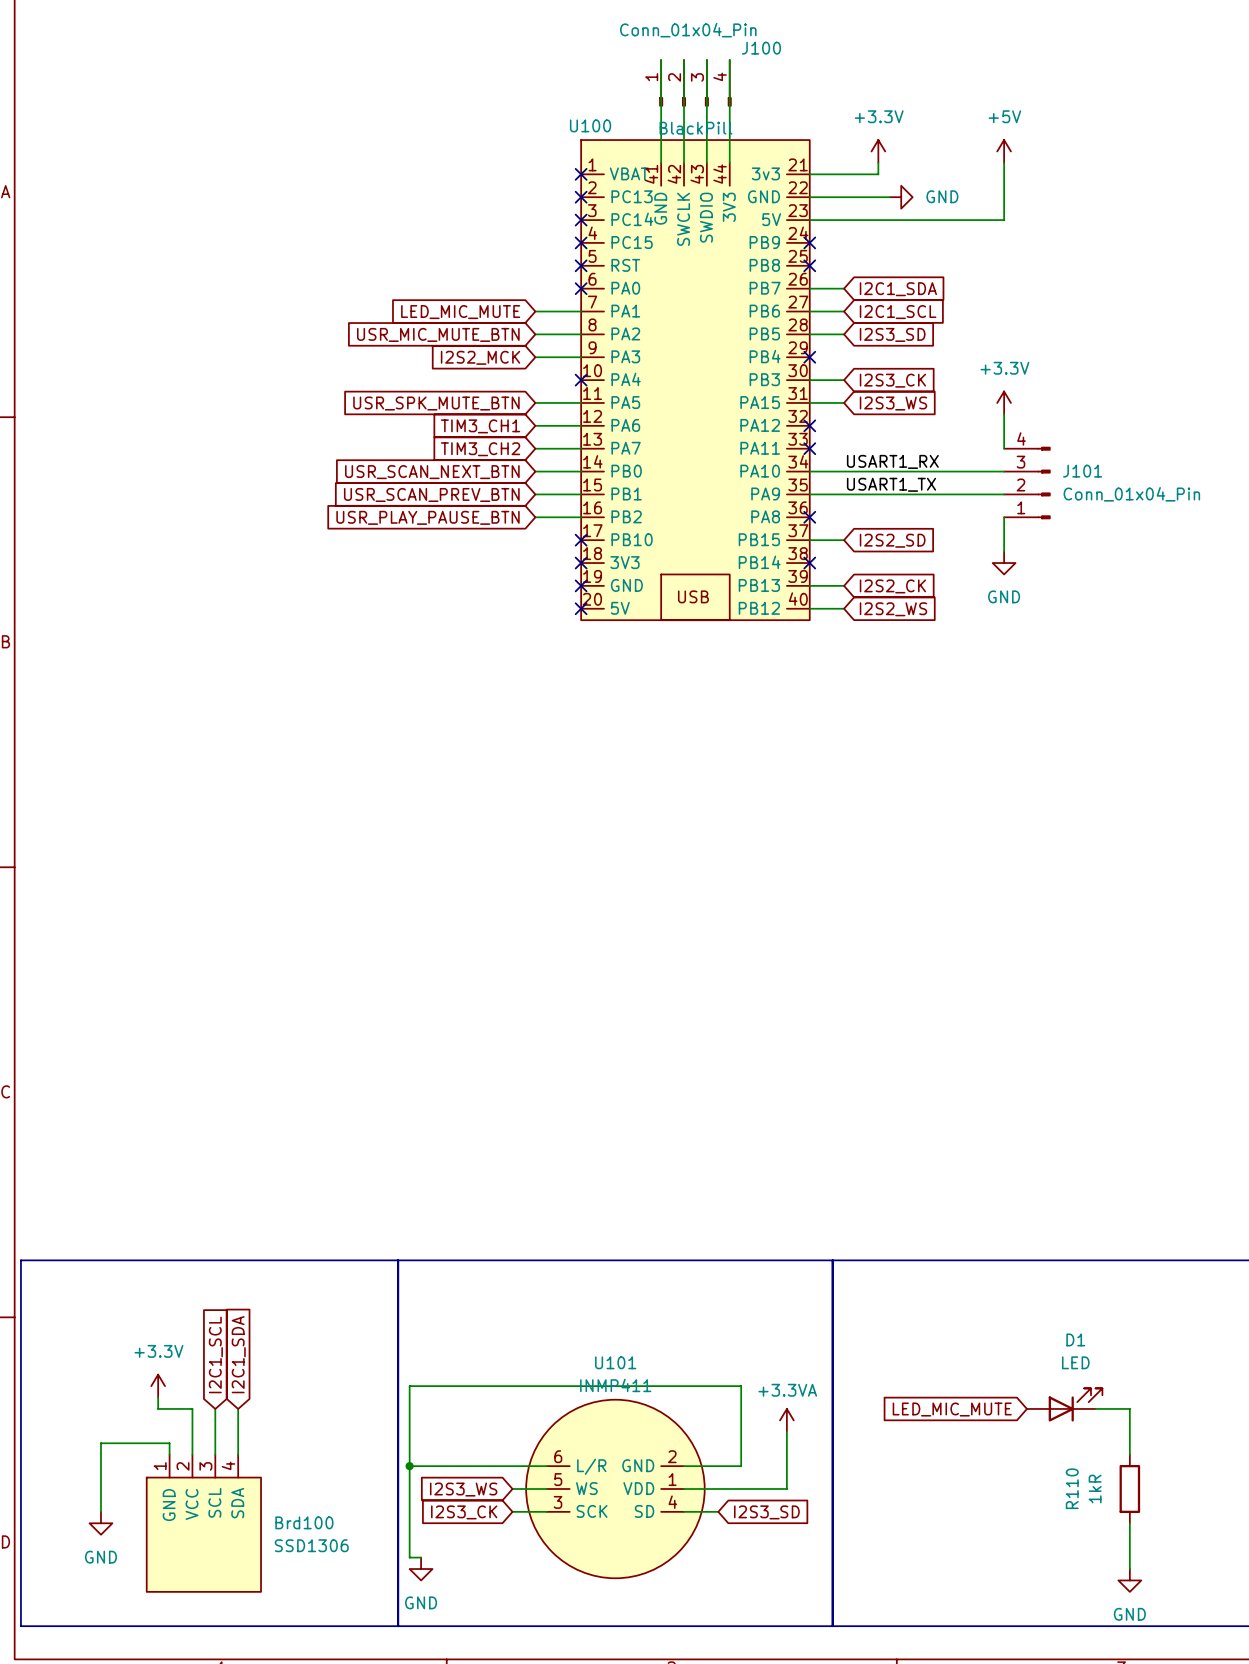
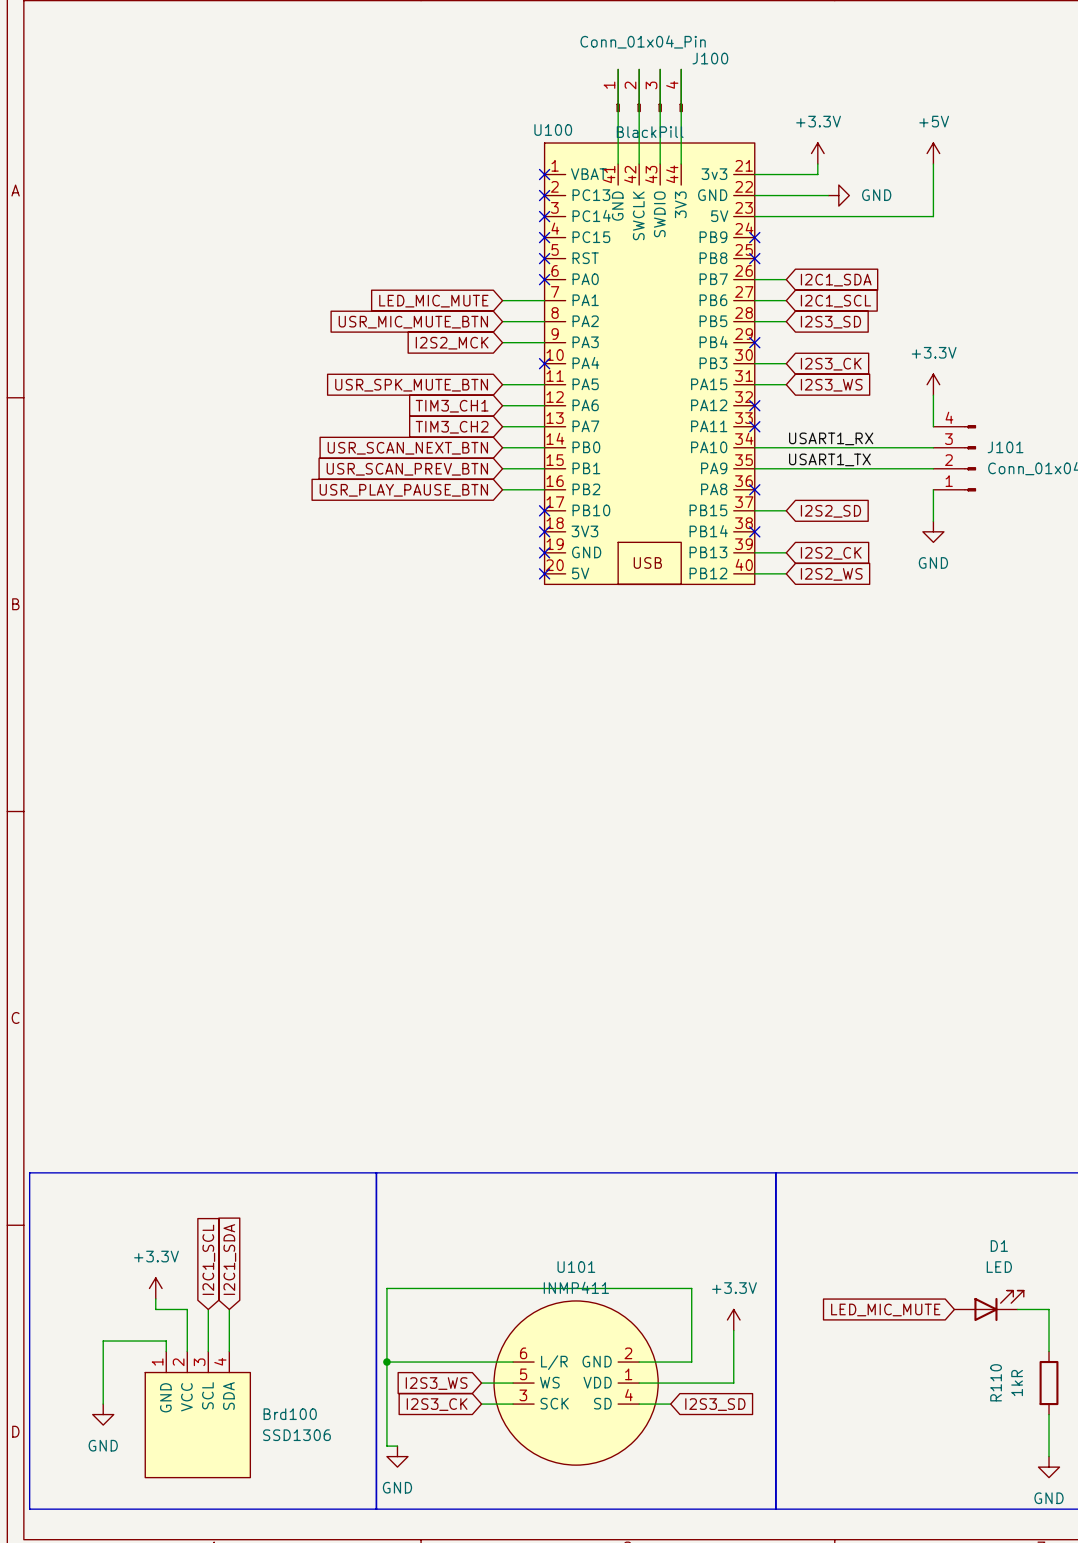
power symbol: +3.3VA (786, 1420) -> +3.3V (733, 1319)

